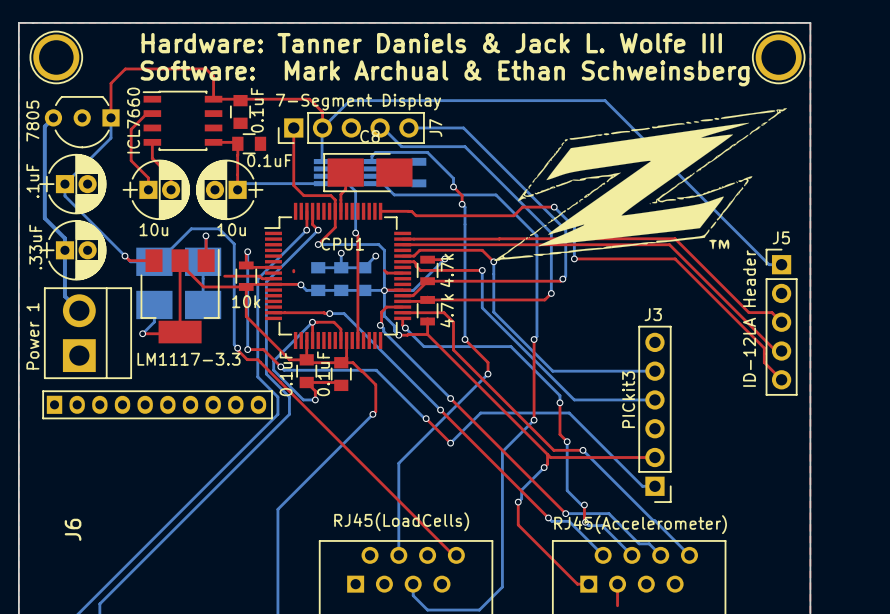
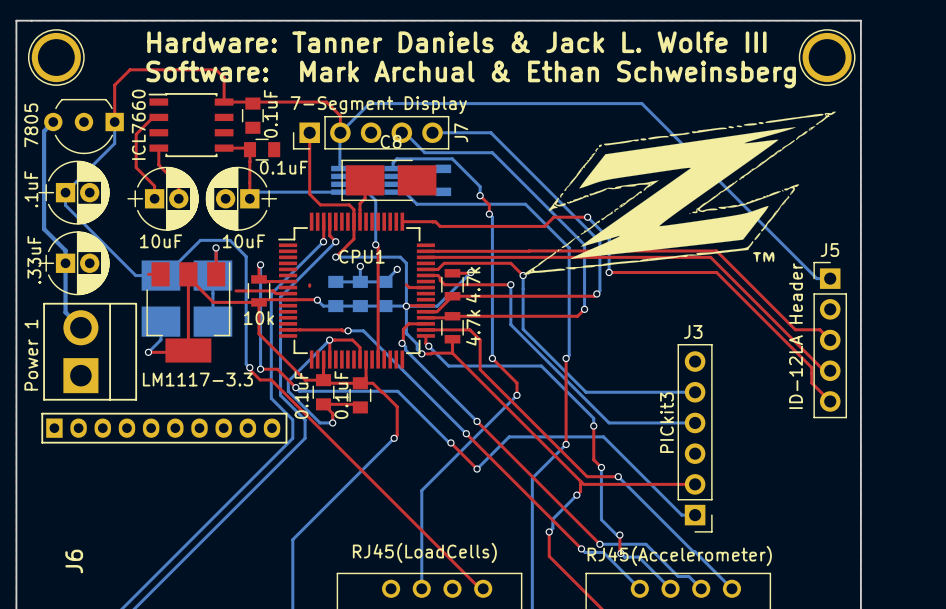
part value: 10u (153, 229) -> 10uF (161, 241)
part value: 10u (231, 229) -> 10uF (243, 241)
top track: (125, 256) (129, 260) (142, 260) -> none
via: (125, 256) -> none

